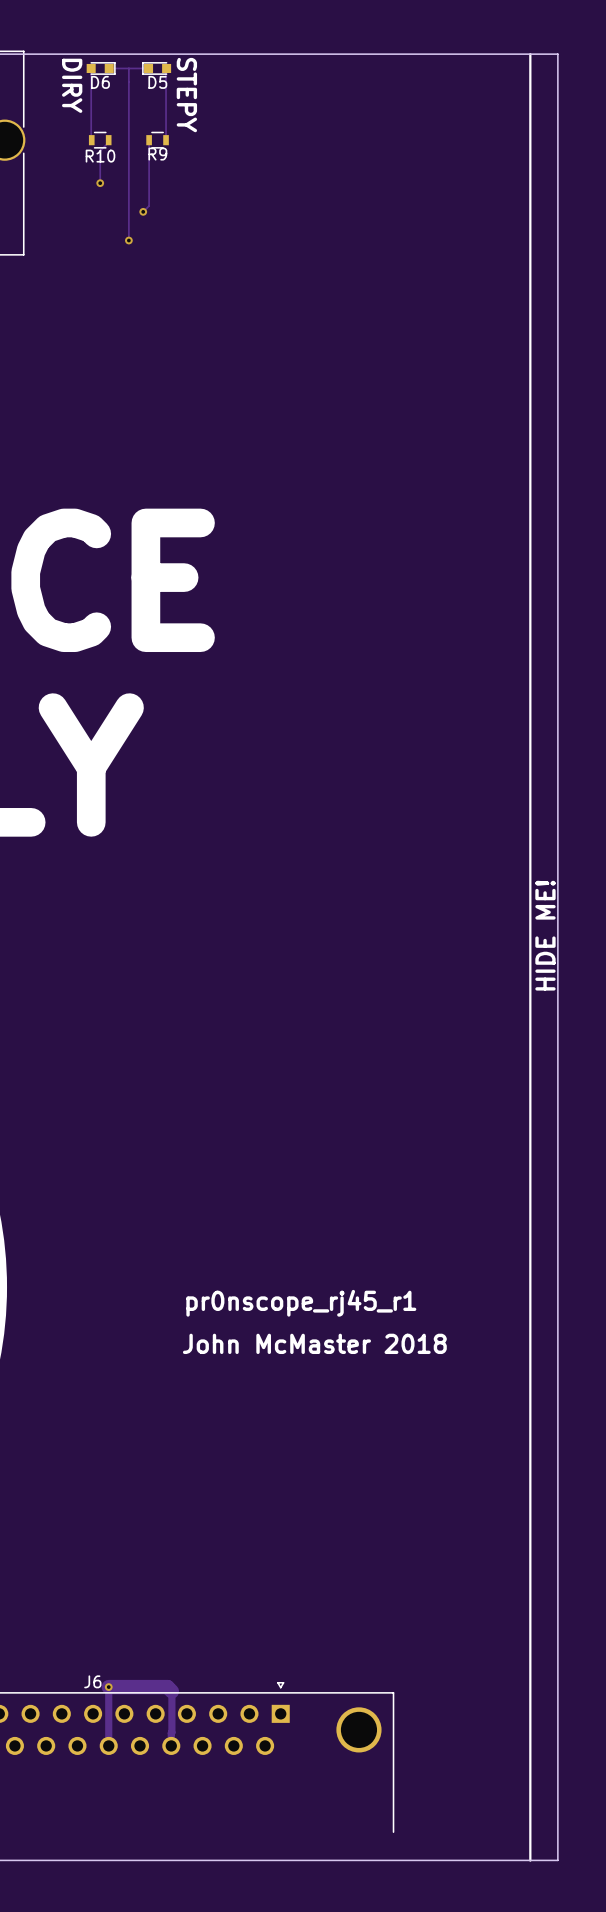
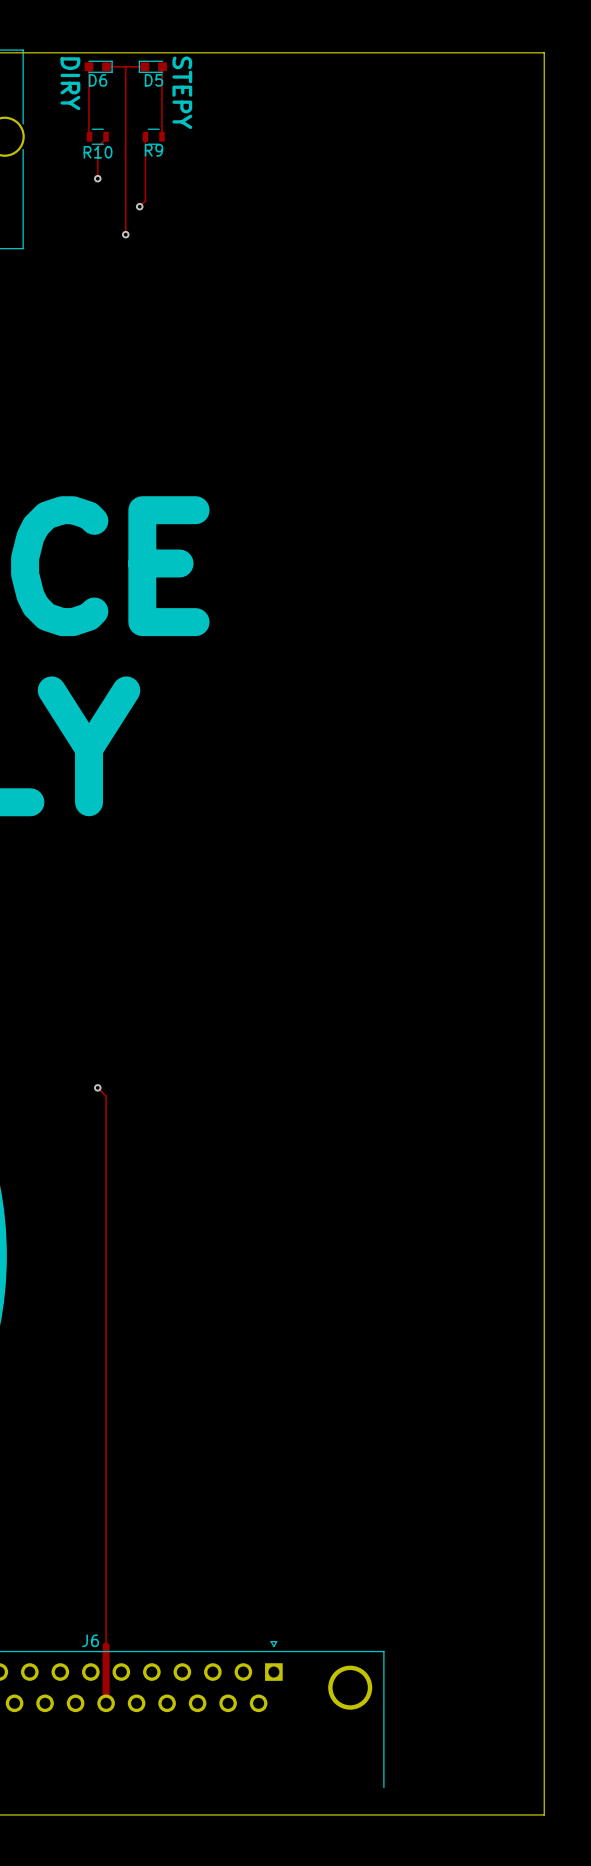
line: (530, 54) (530, 1860) -> none
text: HIDE ME! (545, 935) -> none
via: none -> (97, 1087)
text: pr0nscope_rj45_r1 (301, 1303) -> none
text: John McMaster 2018 (314, 1343) -> none
track: (108, 1687) (167, 1687) (171, 1691) (171, 1745) -> (106, 1645) (106, 1096) (97, 1087)
via: (108, 1687) -> none

